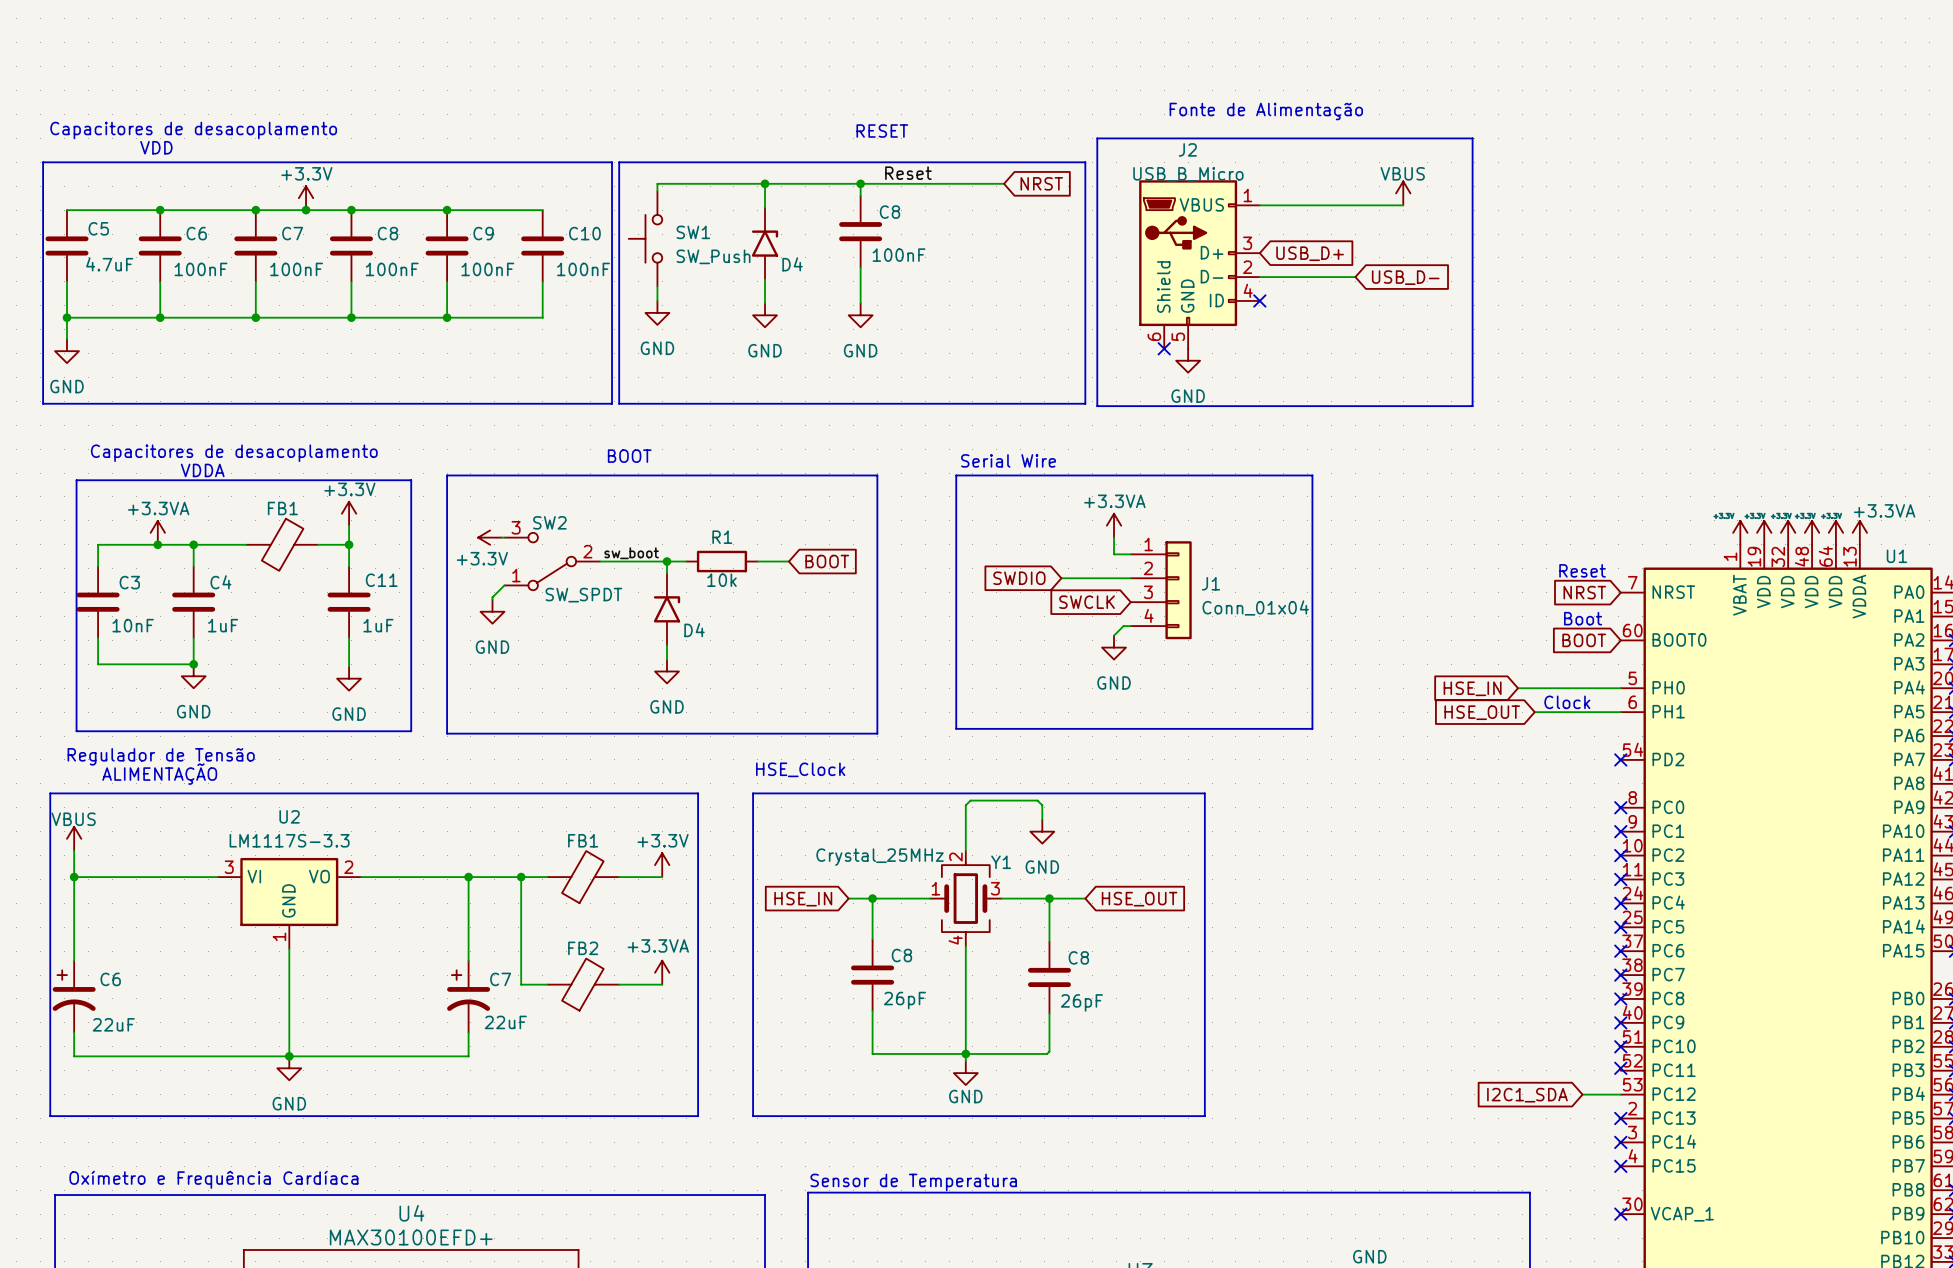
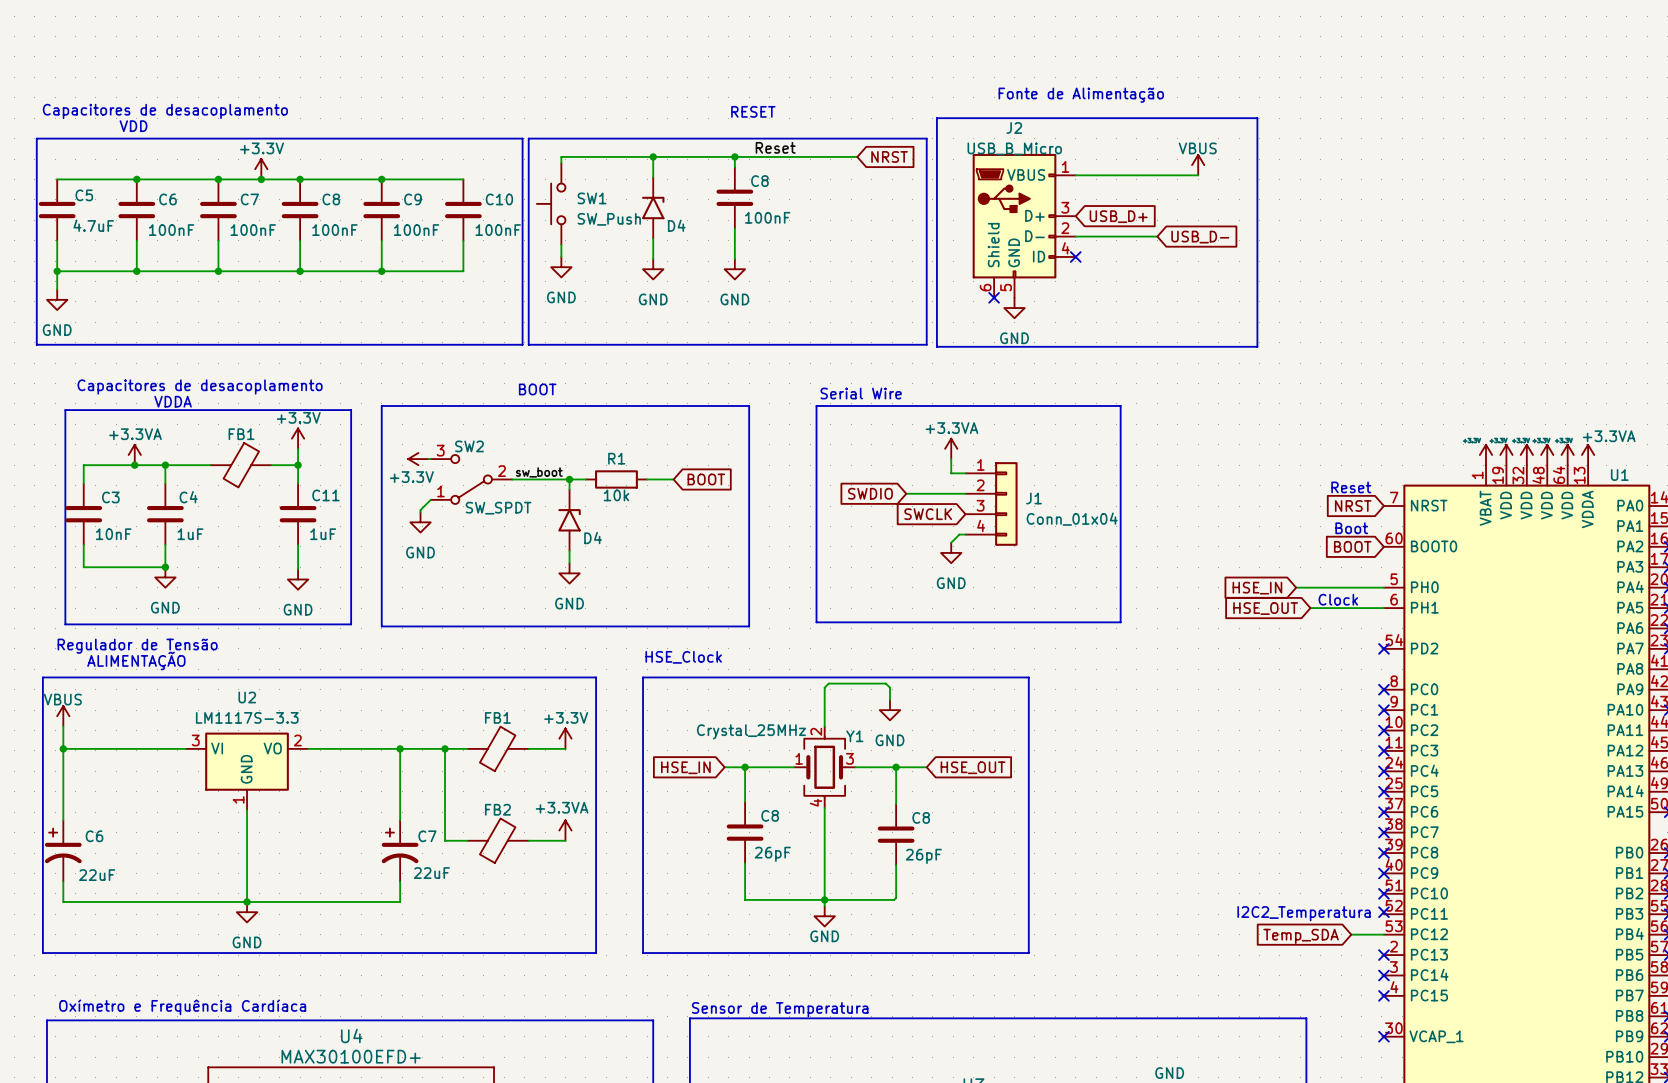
text: none -> I2C2_Temperatura (1304, 913)
global label: I2C1_SDA (1527, 1095) -> Temp_SDA (1301, 936)

